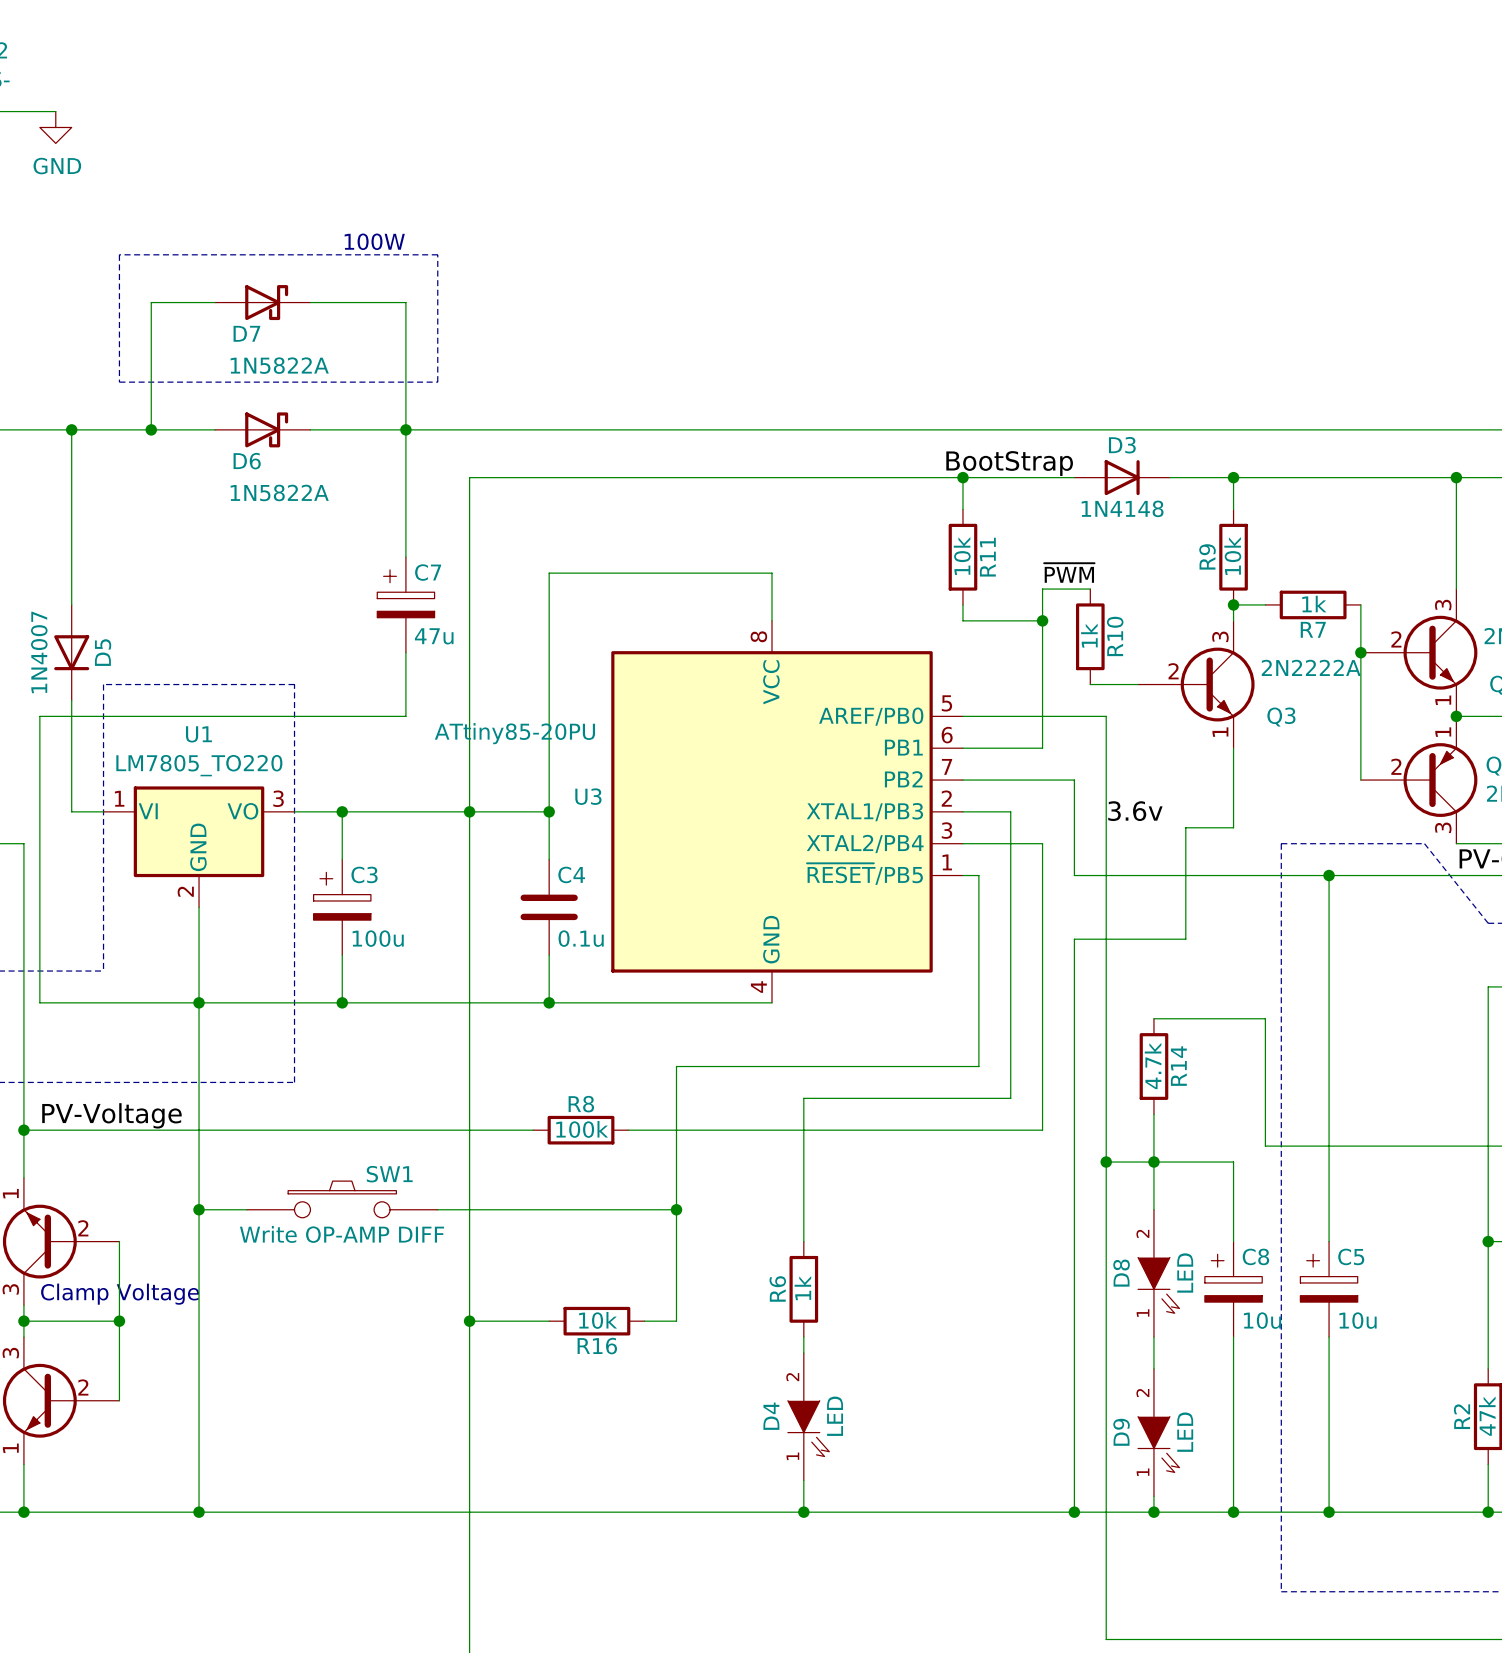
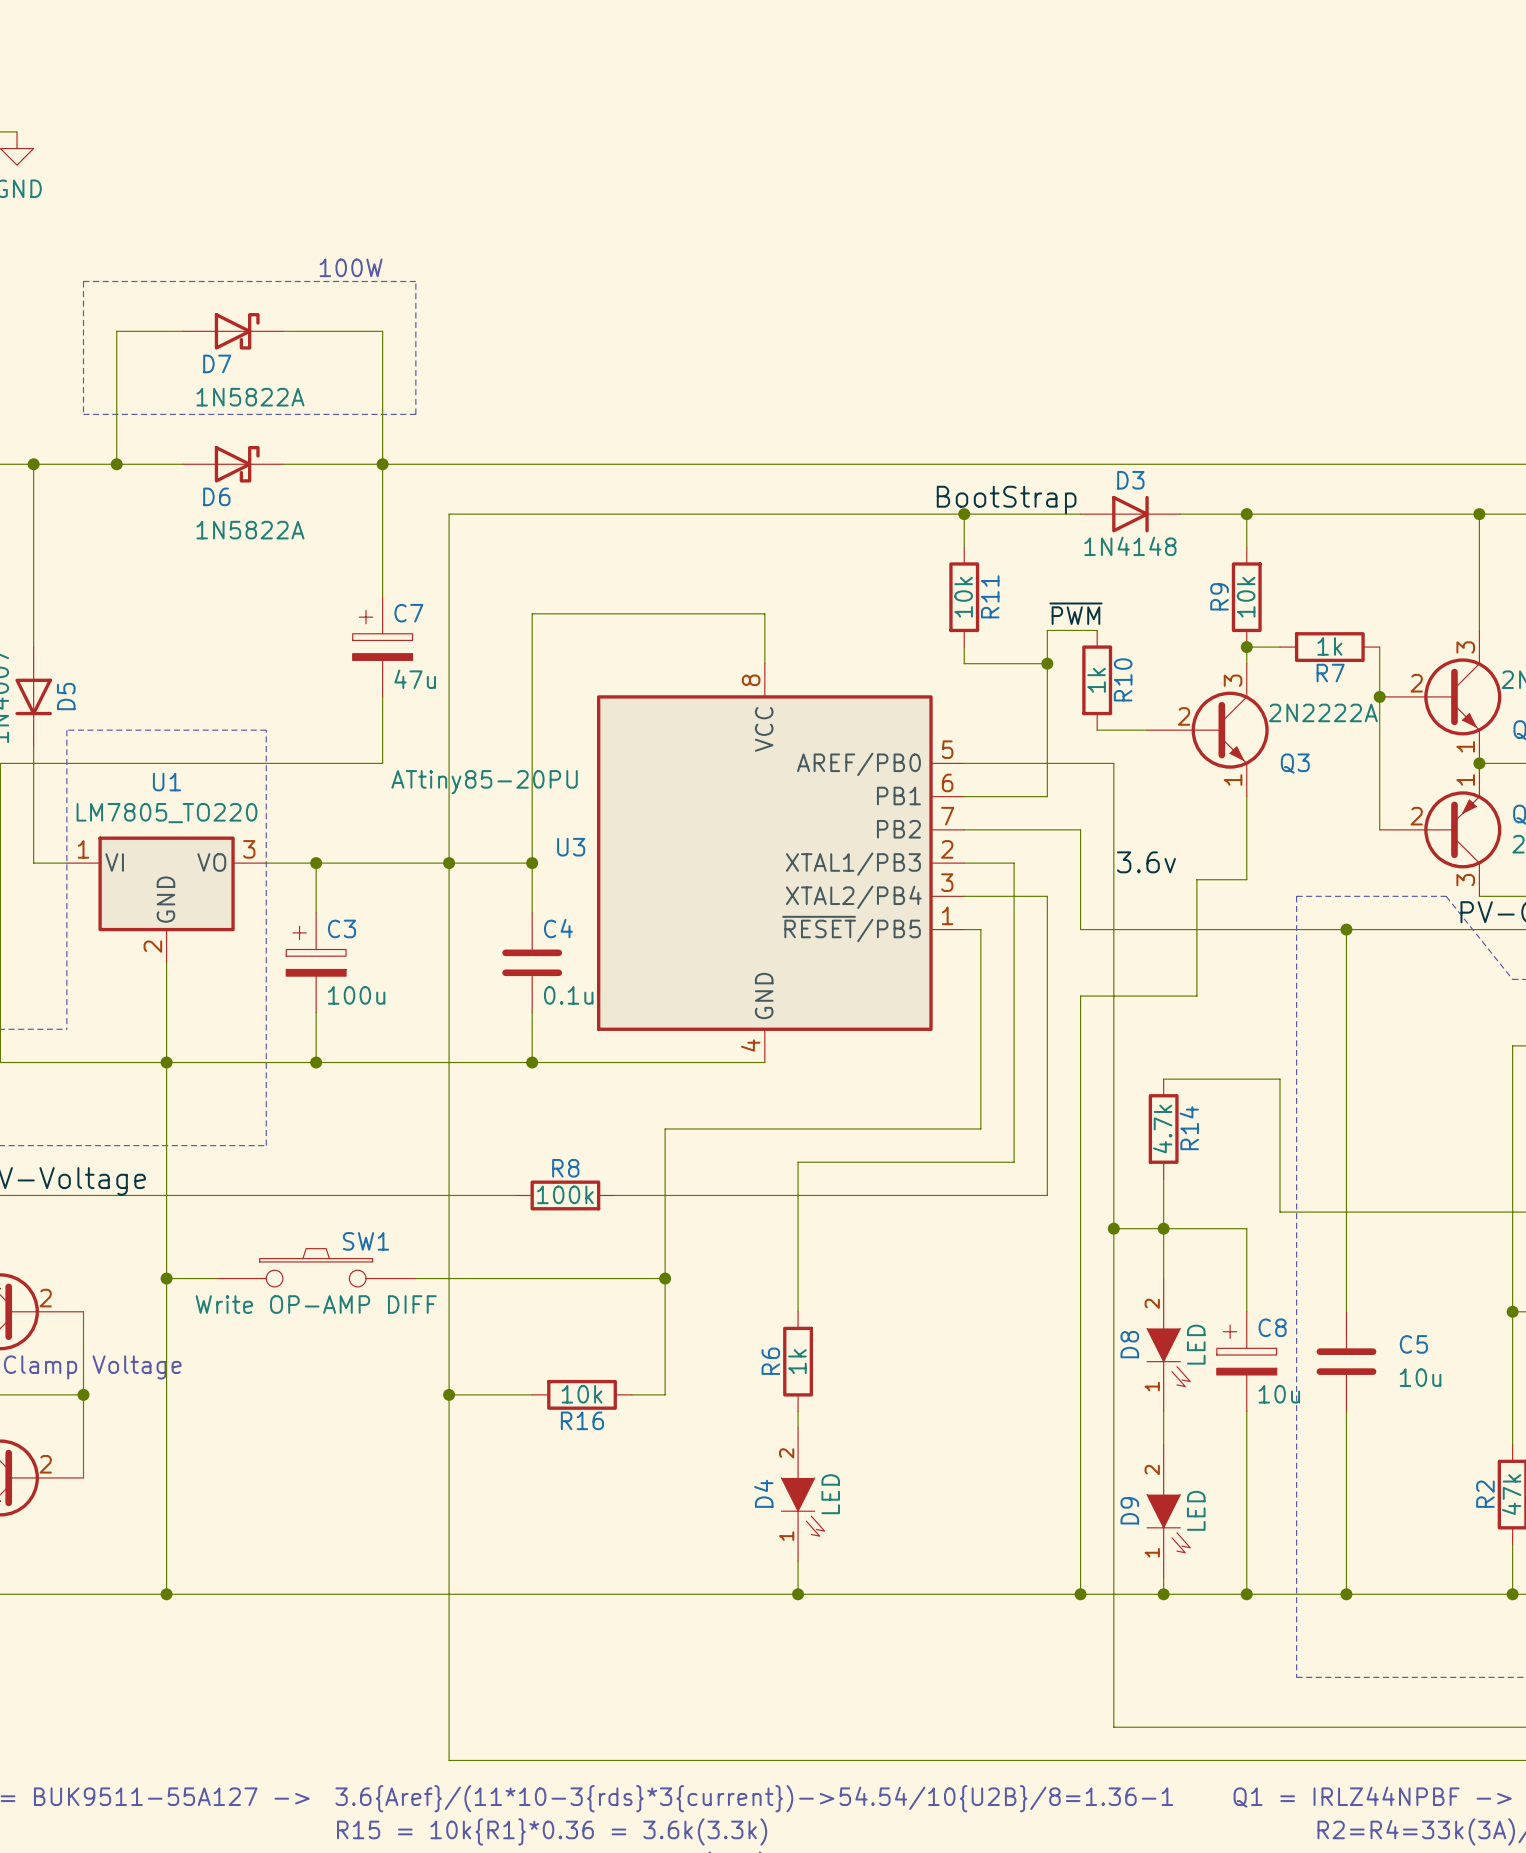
C5 symbol: [1300, 1241, 1358, 1338] -> [1316, 1311, 1377, 1412]
C5 name position: C5 (1351, 1256) -> C5 (1413, 1344)
C5 value position: 10u (1358, 1320) -> 10u (1420, 1377)

